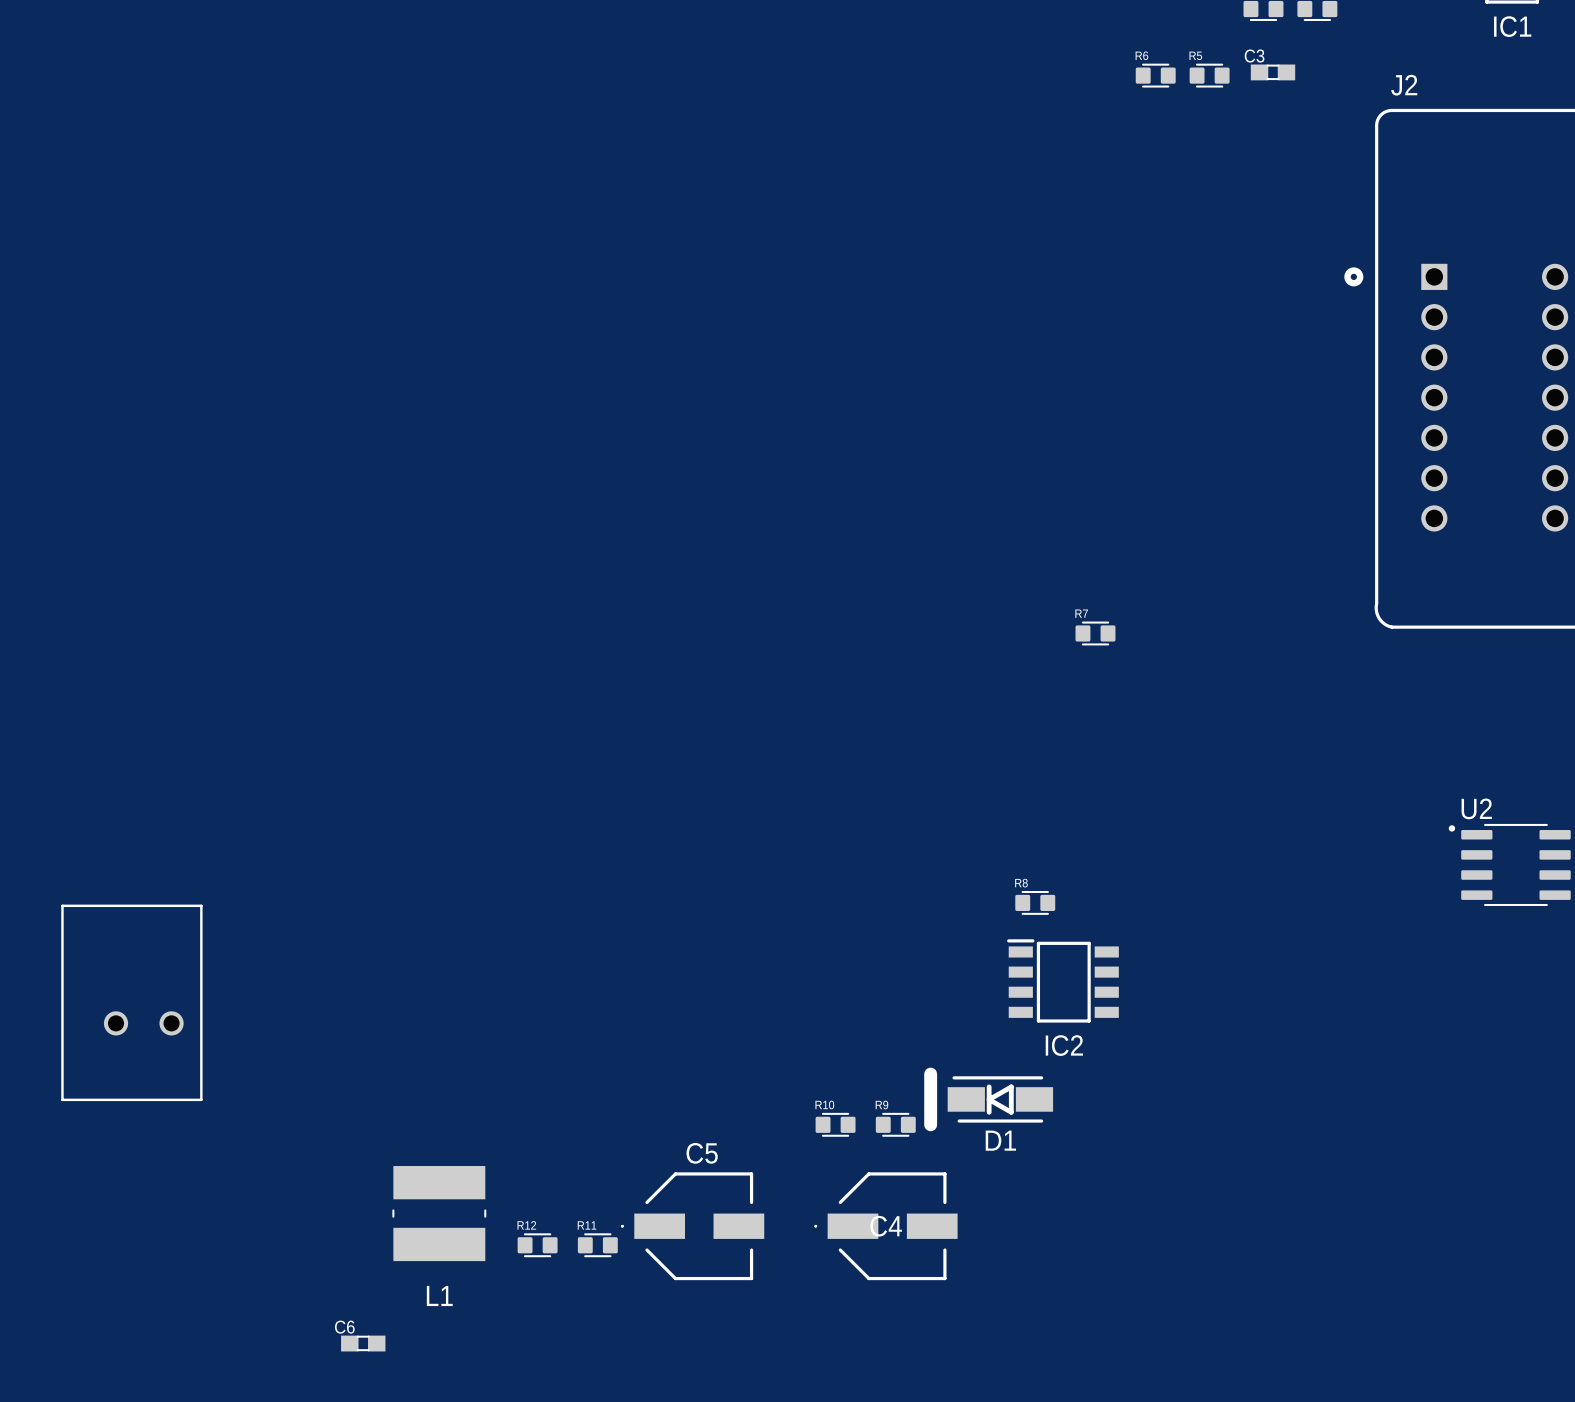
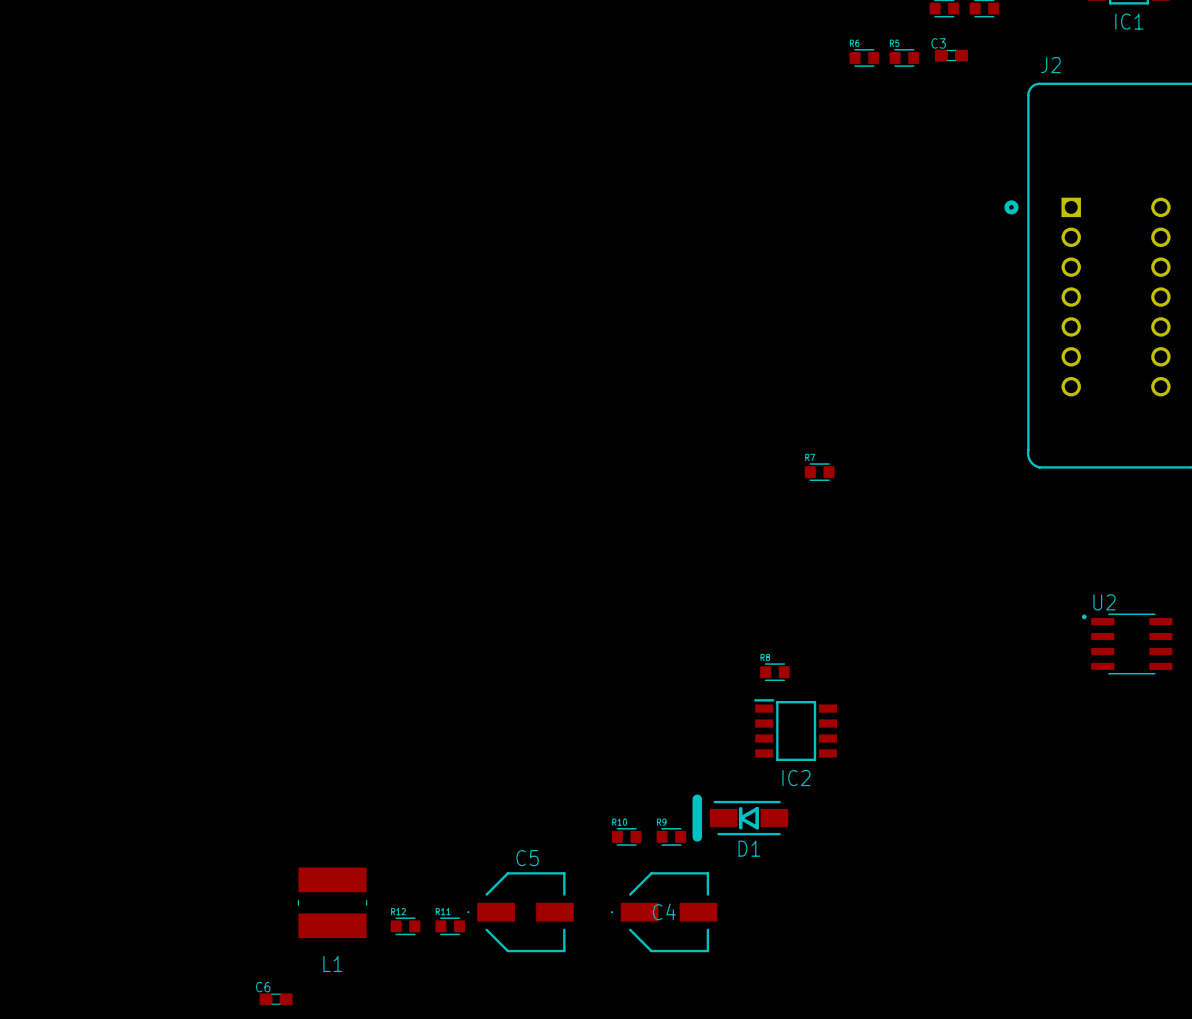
part: (131, 1002) -> none

